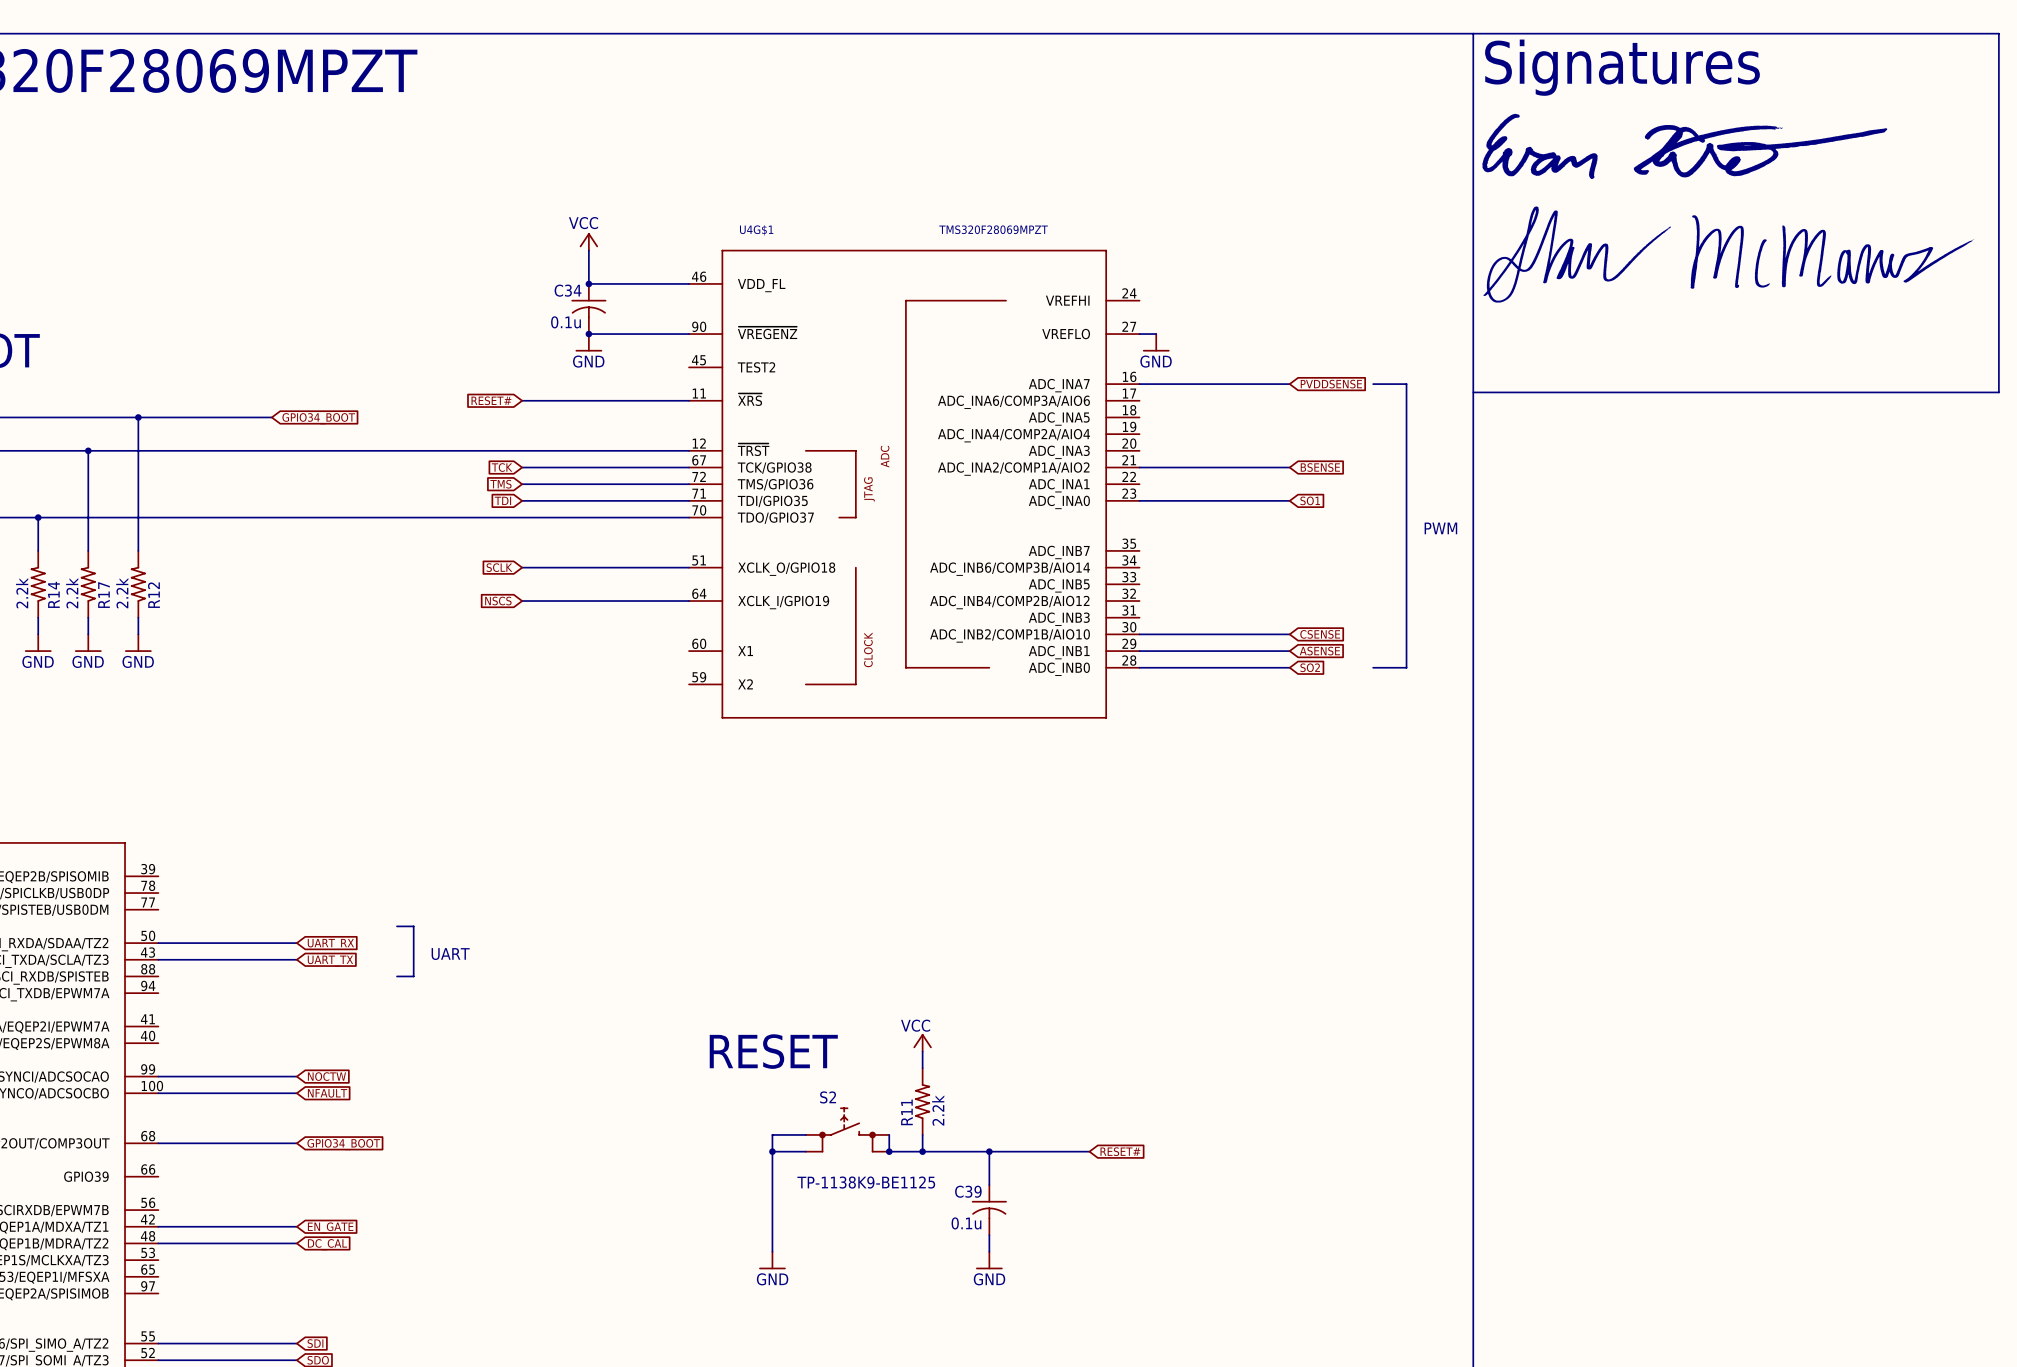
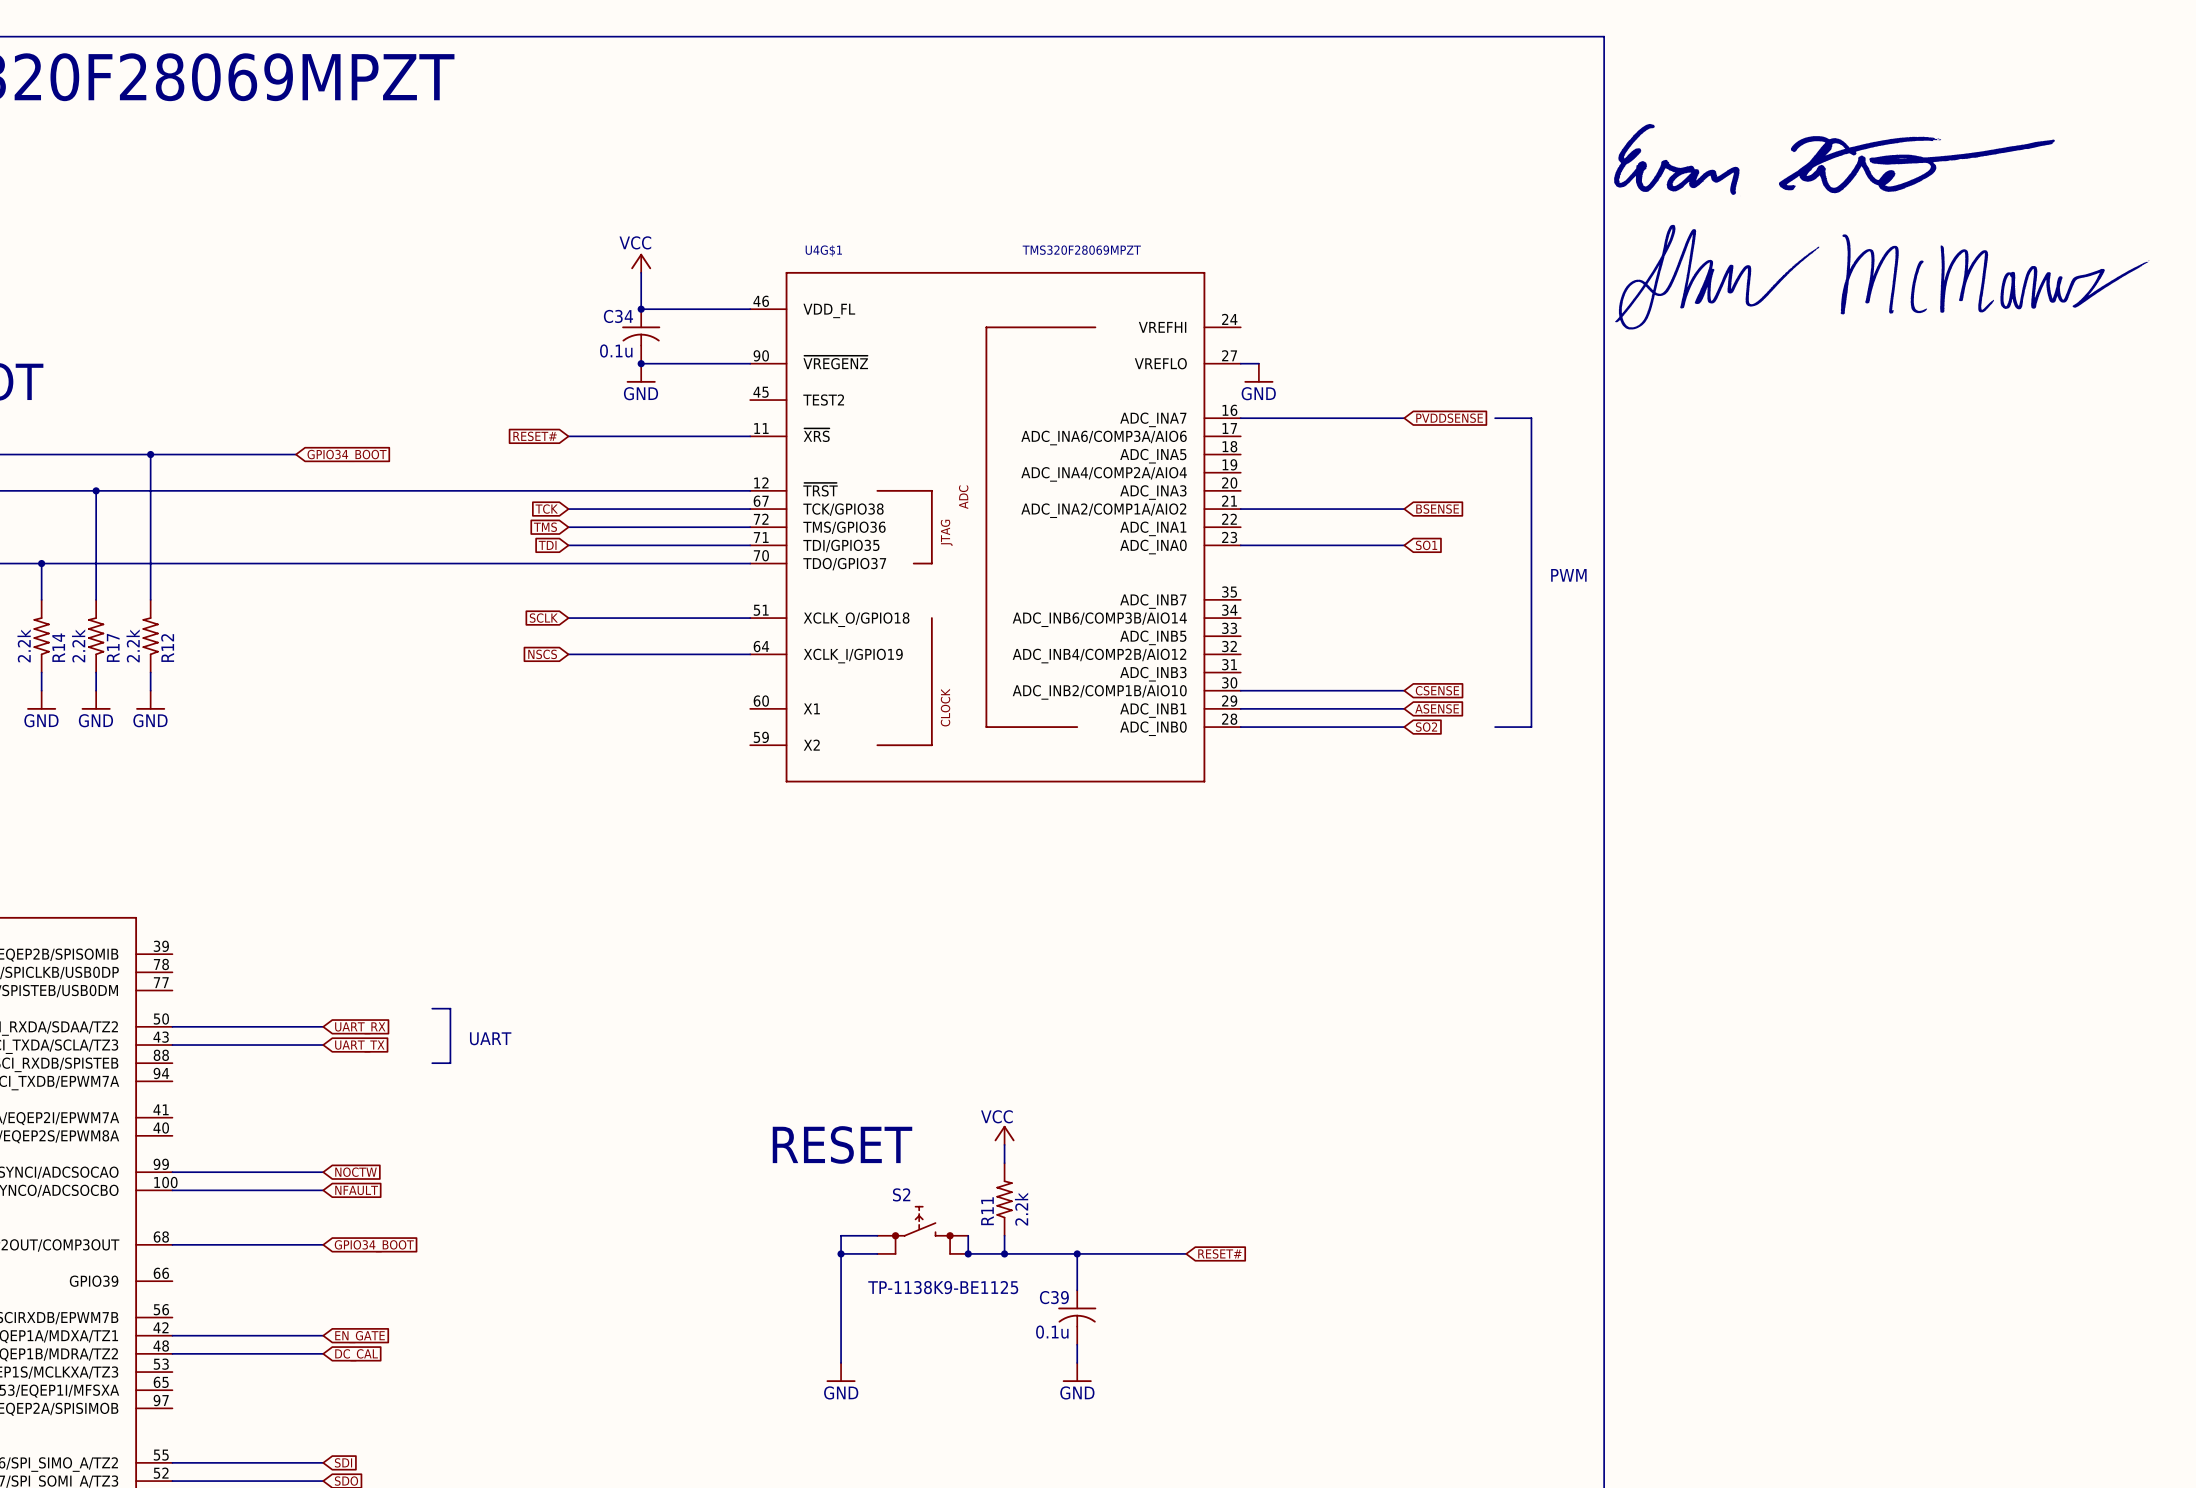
line: (1473, 33) (1998, 33) (1998, 392) (1473, 392) -> none
text: Signatures (1622, 67) -> none

